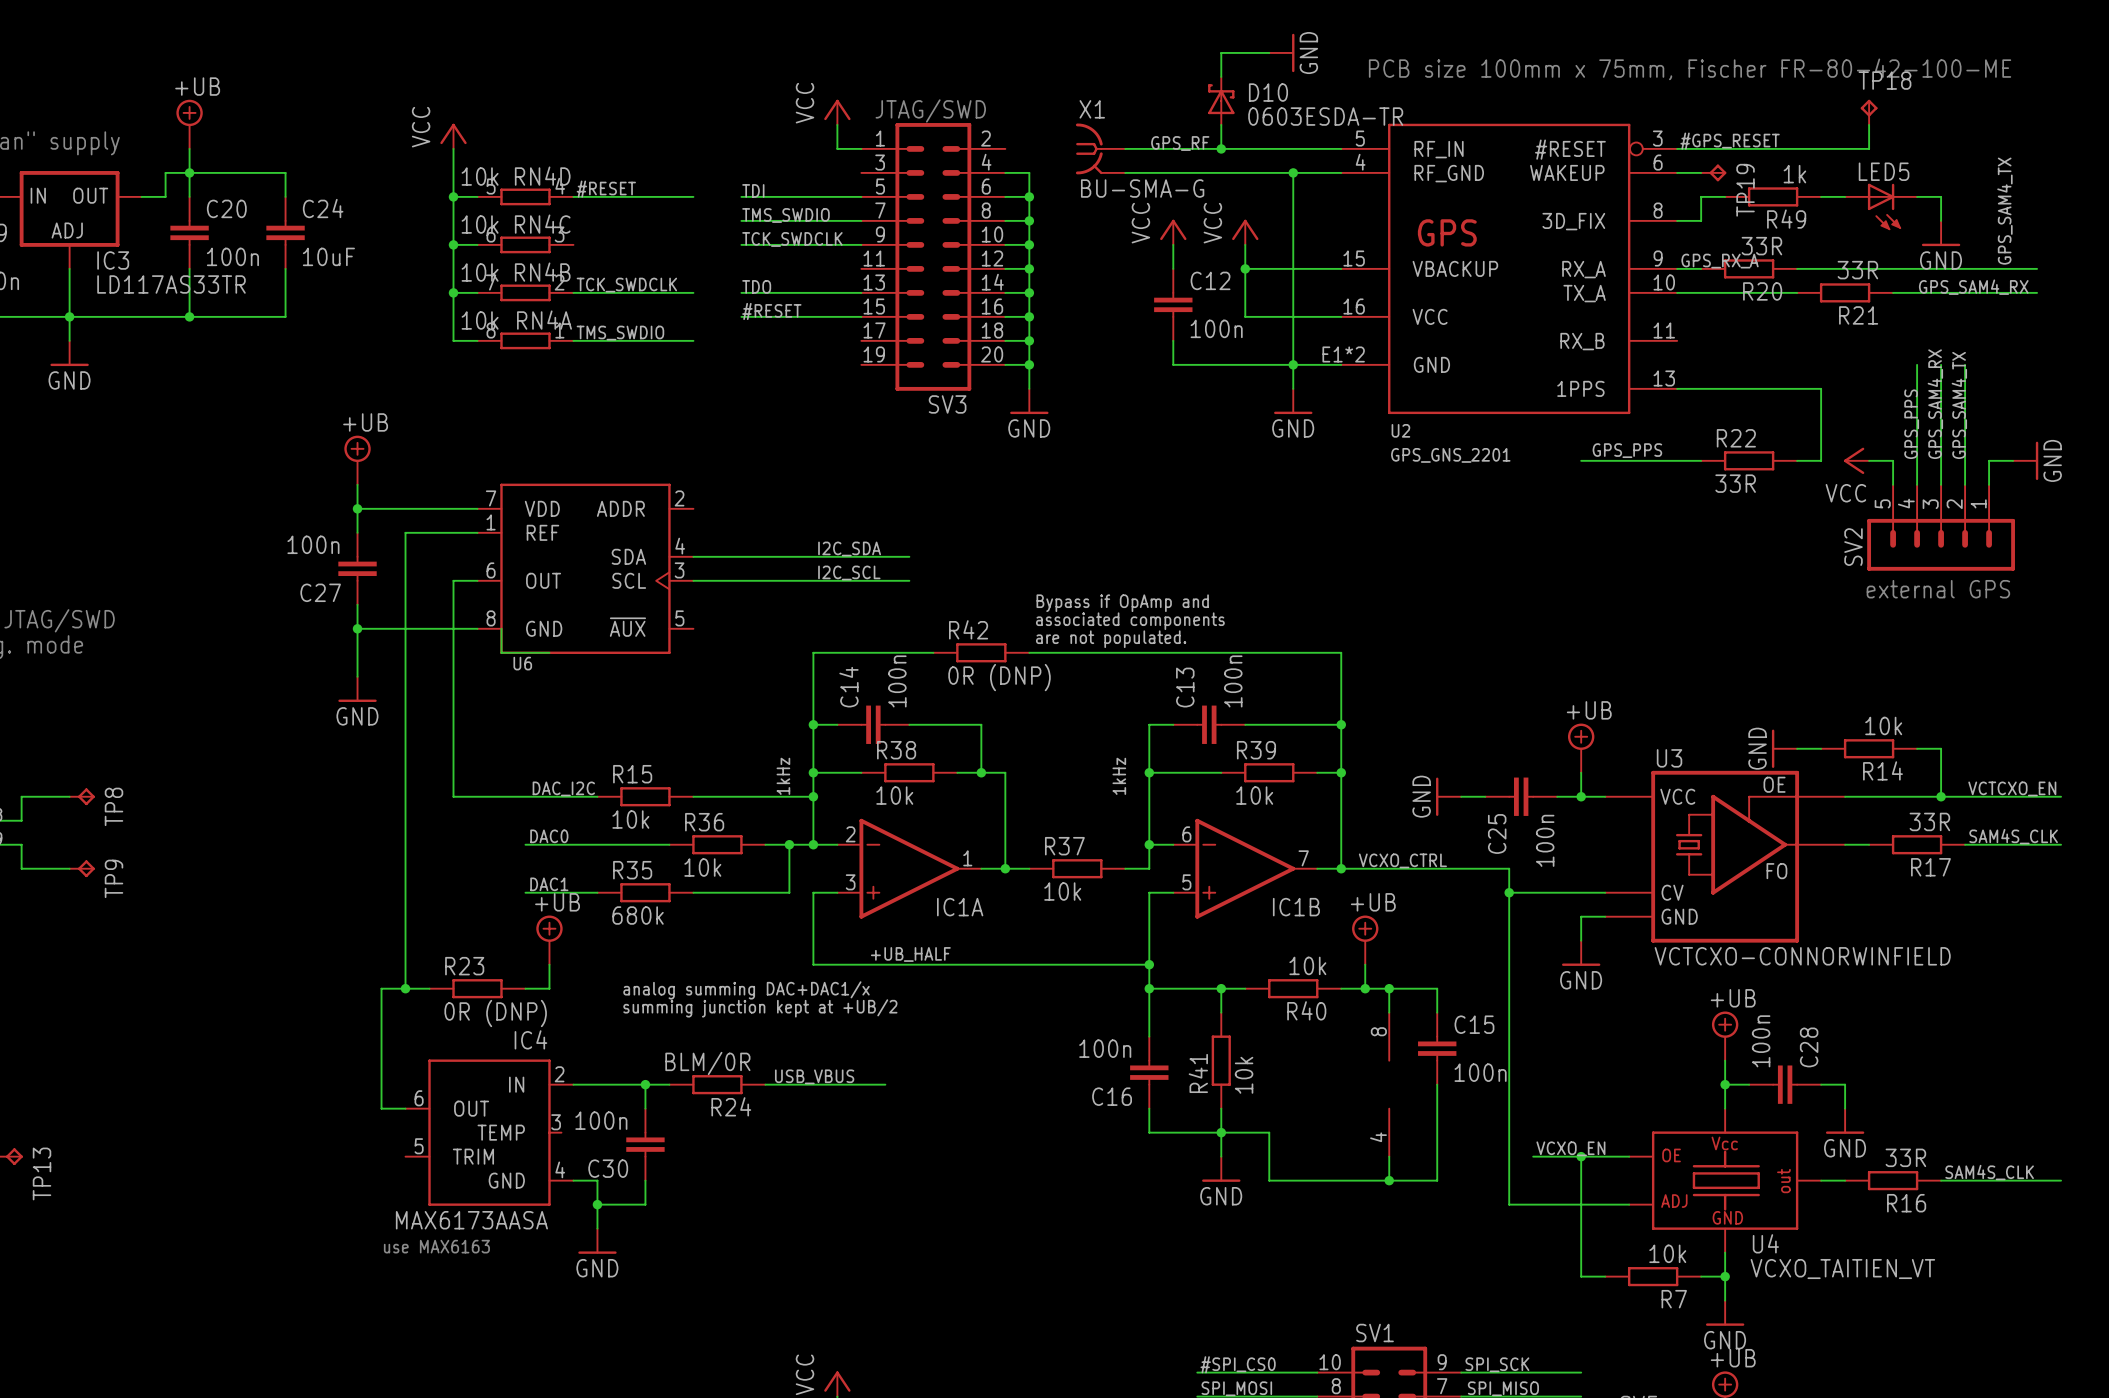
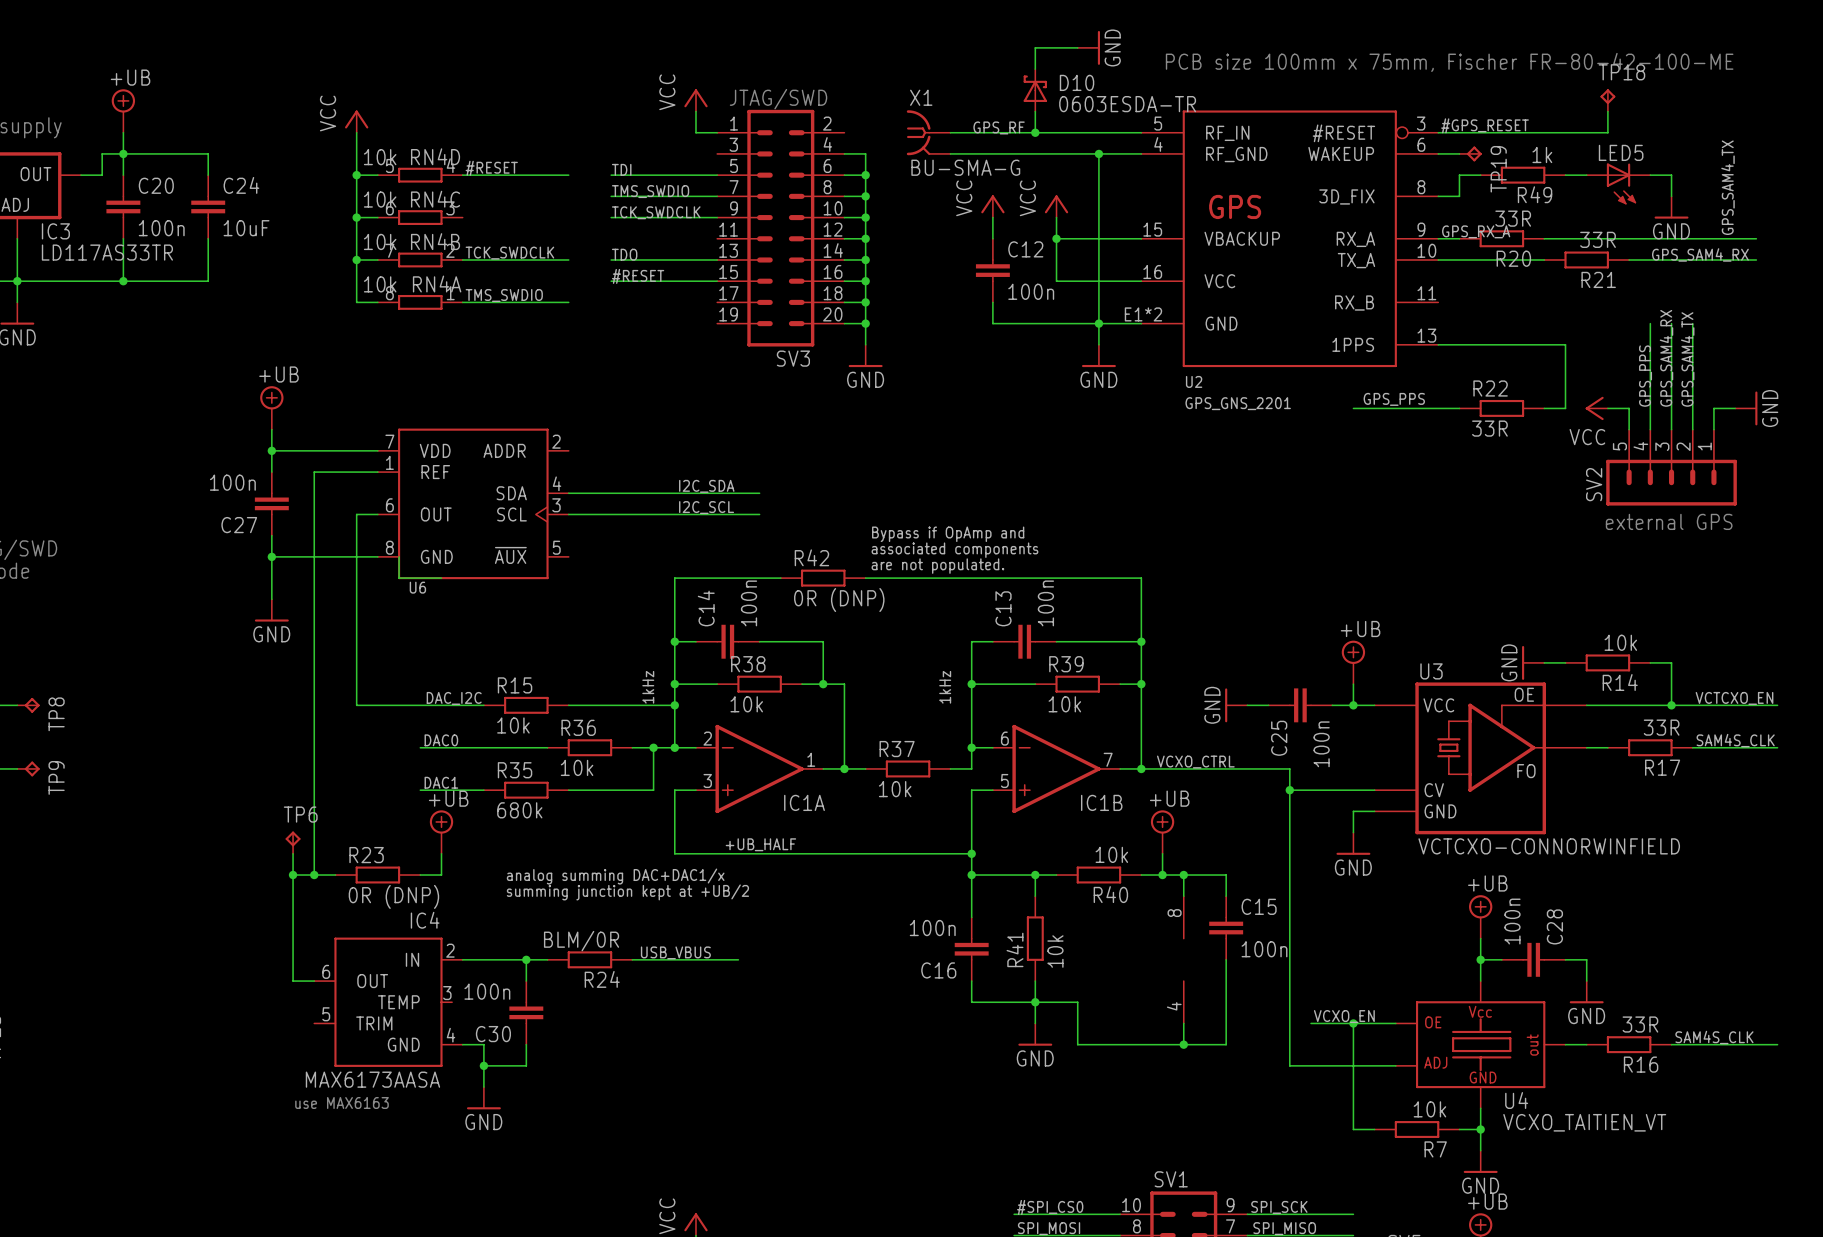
TP6: none -> (293, 842)
wire: none -> (293, 853) (293, 875)
junction: none -> (293, 875)

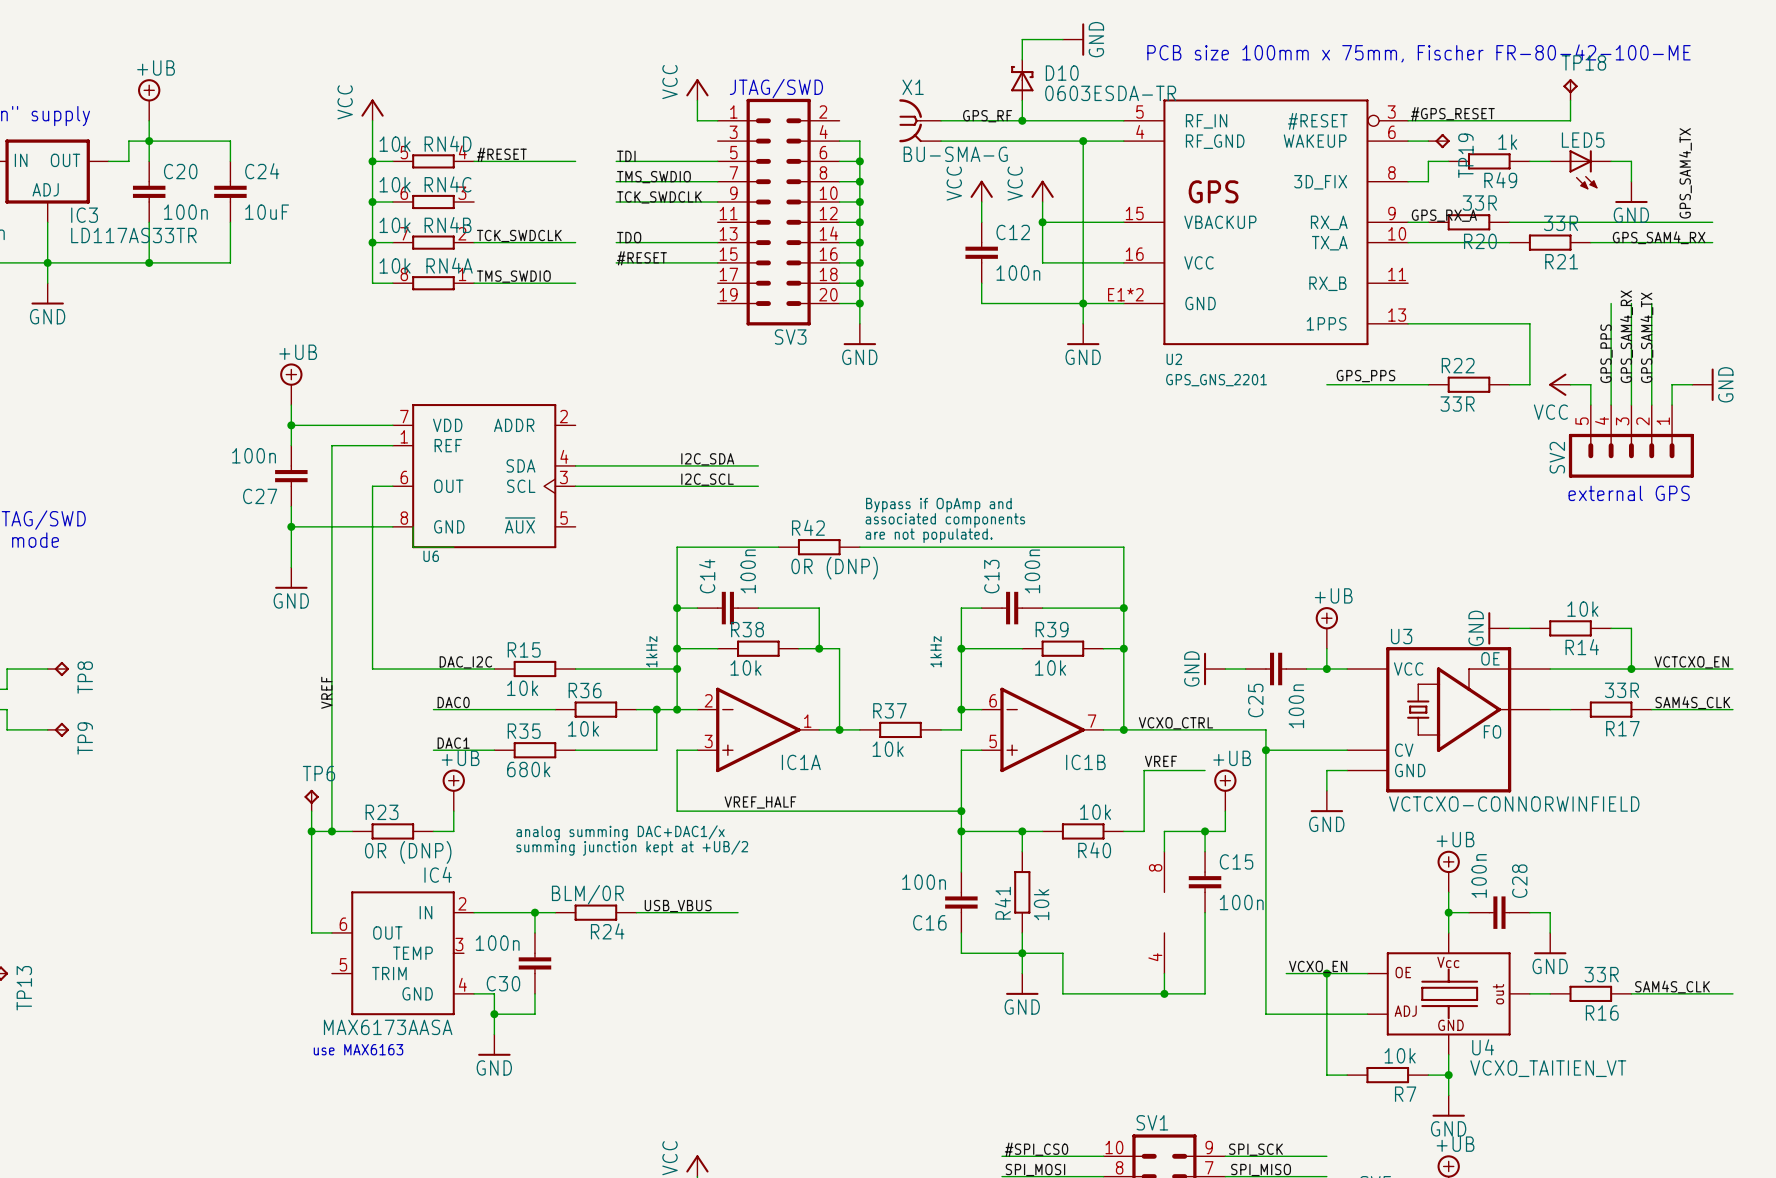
label: none -> VREF (326, 692)
label: none -> VREF (1160, 761)
wire: none -> (1205, 770) (1144, 770) (1144, 811)
power symbol position: +UB (1162, 832) -> +UB (1225, 790)
label: +UB_HALF (760, 844) -> VREF_HALF (760, 802)
wire: none -> (1225, 811) (1225, 831) (1205, 831)
wire: (1162, 875) (1183, 875) -> none
junction: (1162, 875) -> none
junction: (1183, 875) -> none
junction: none -> (1205, 831)

